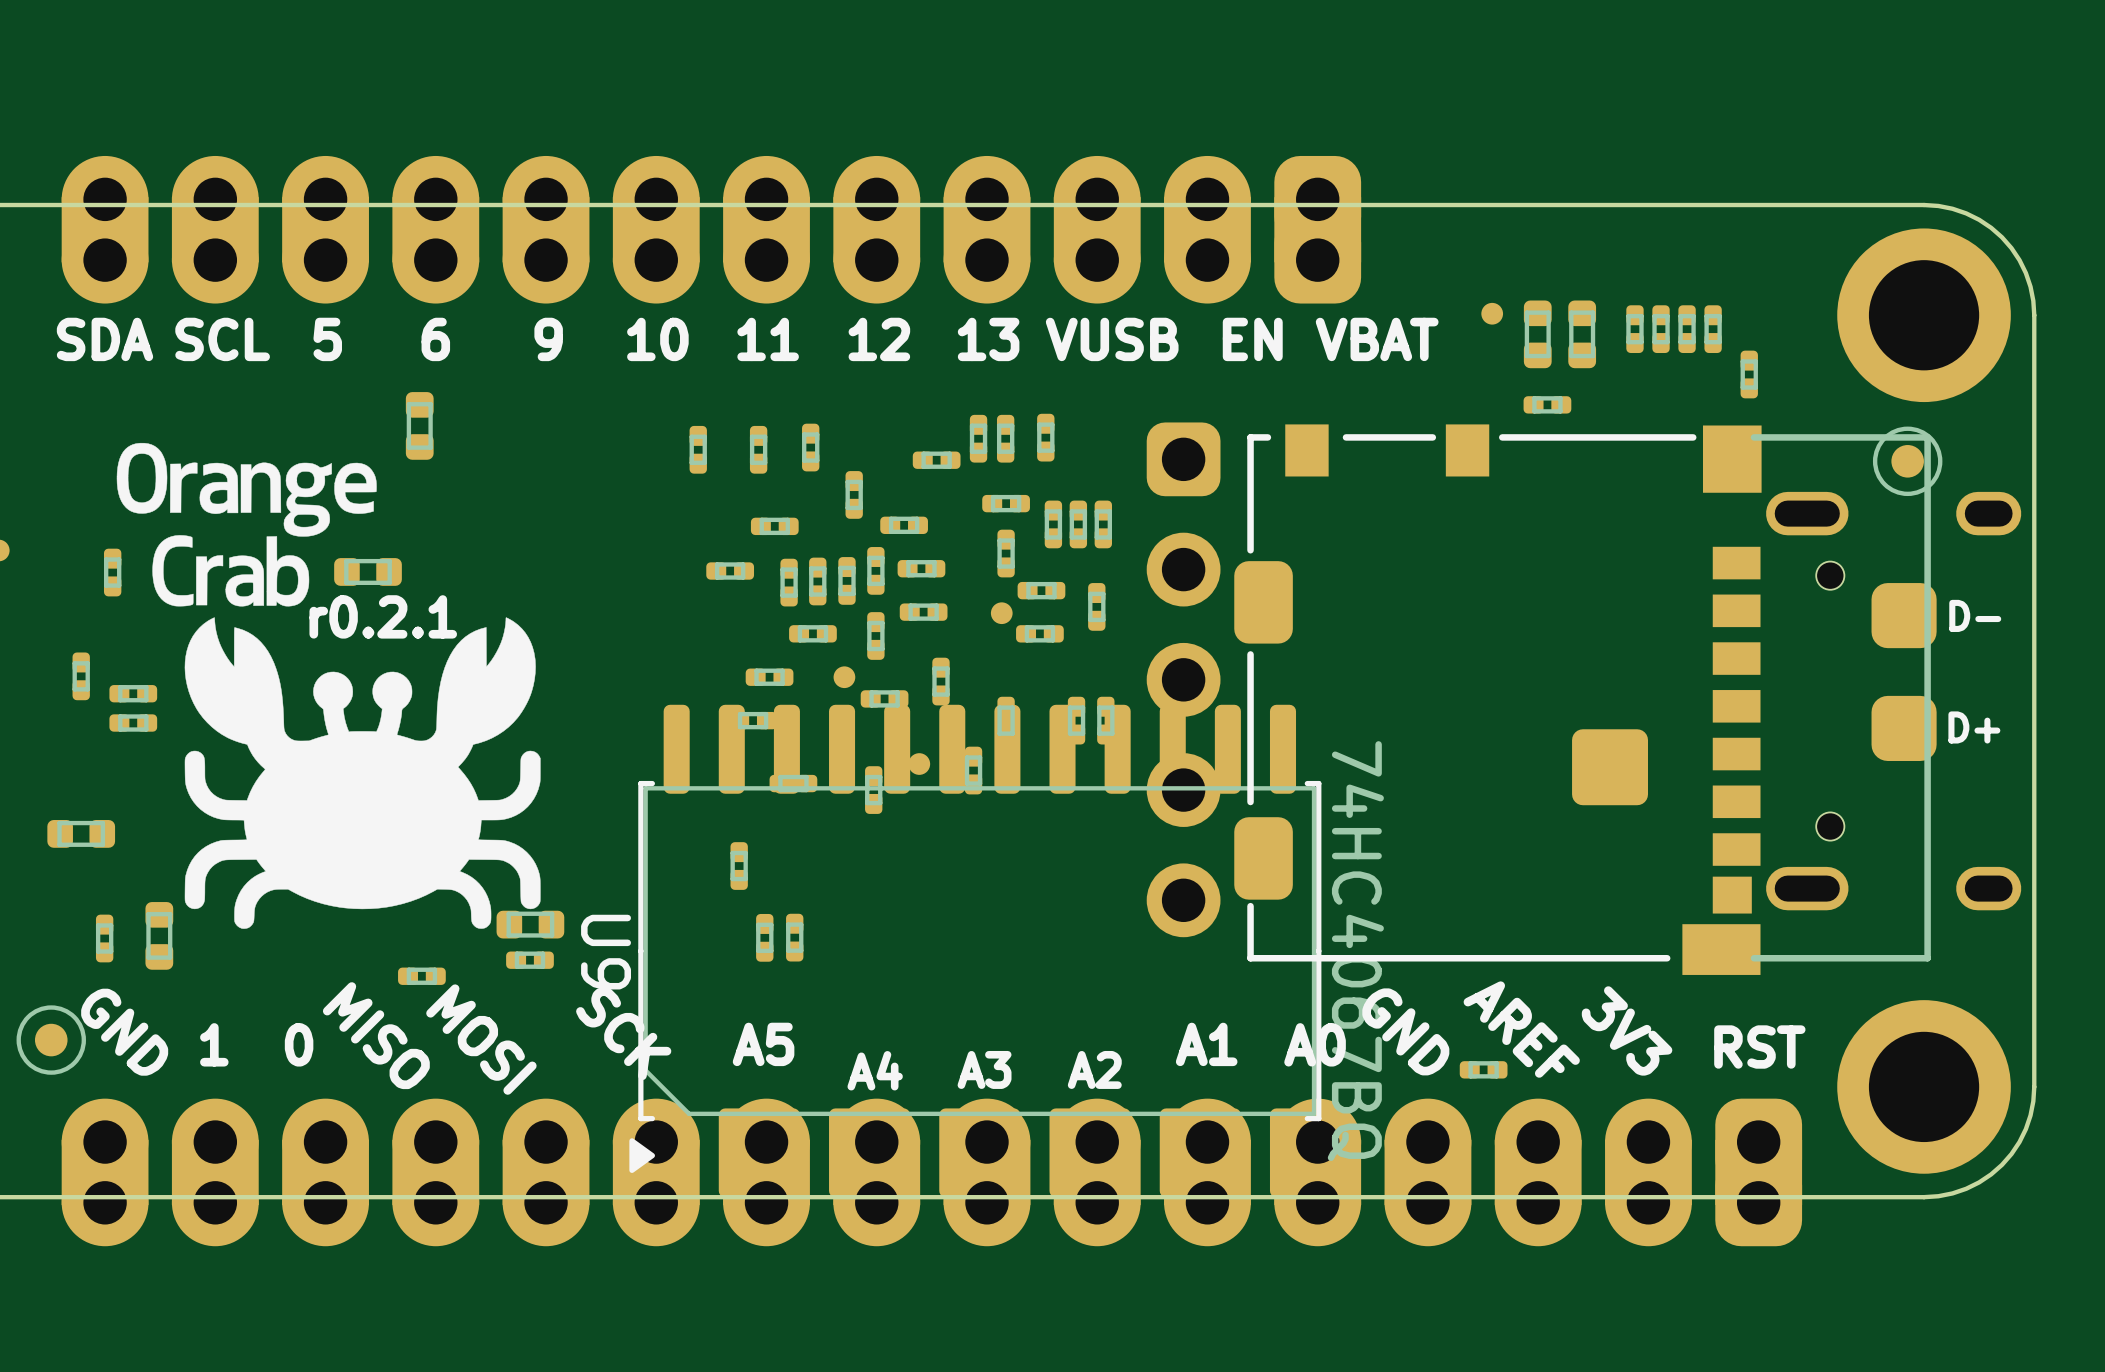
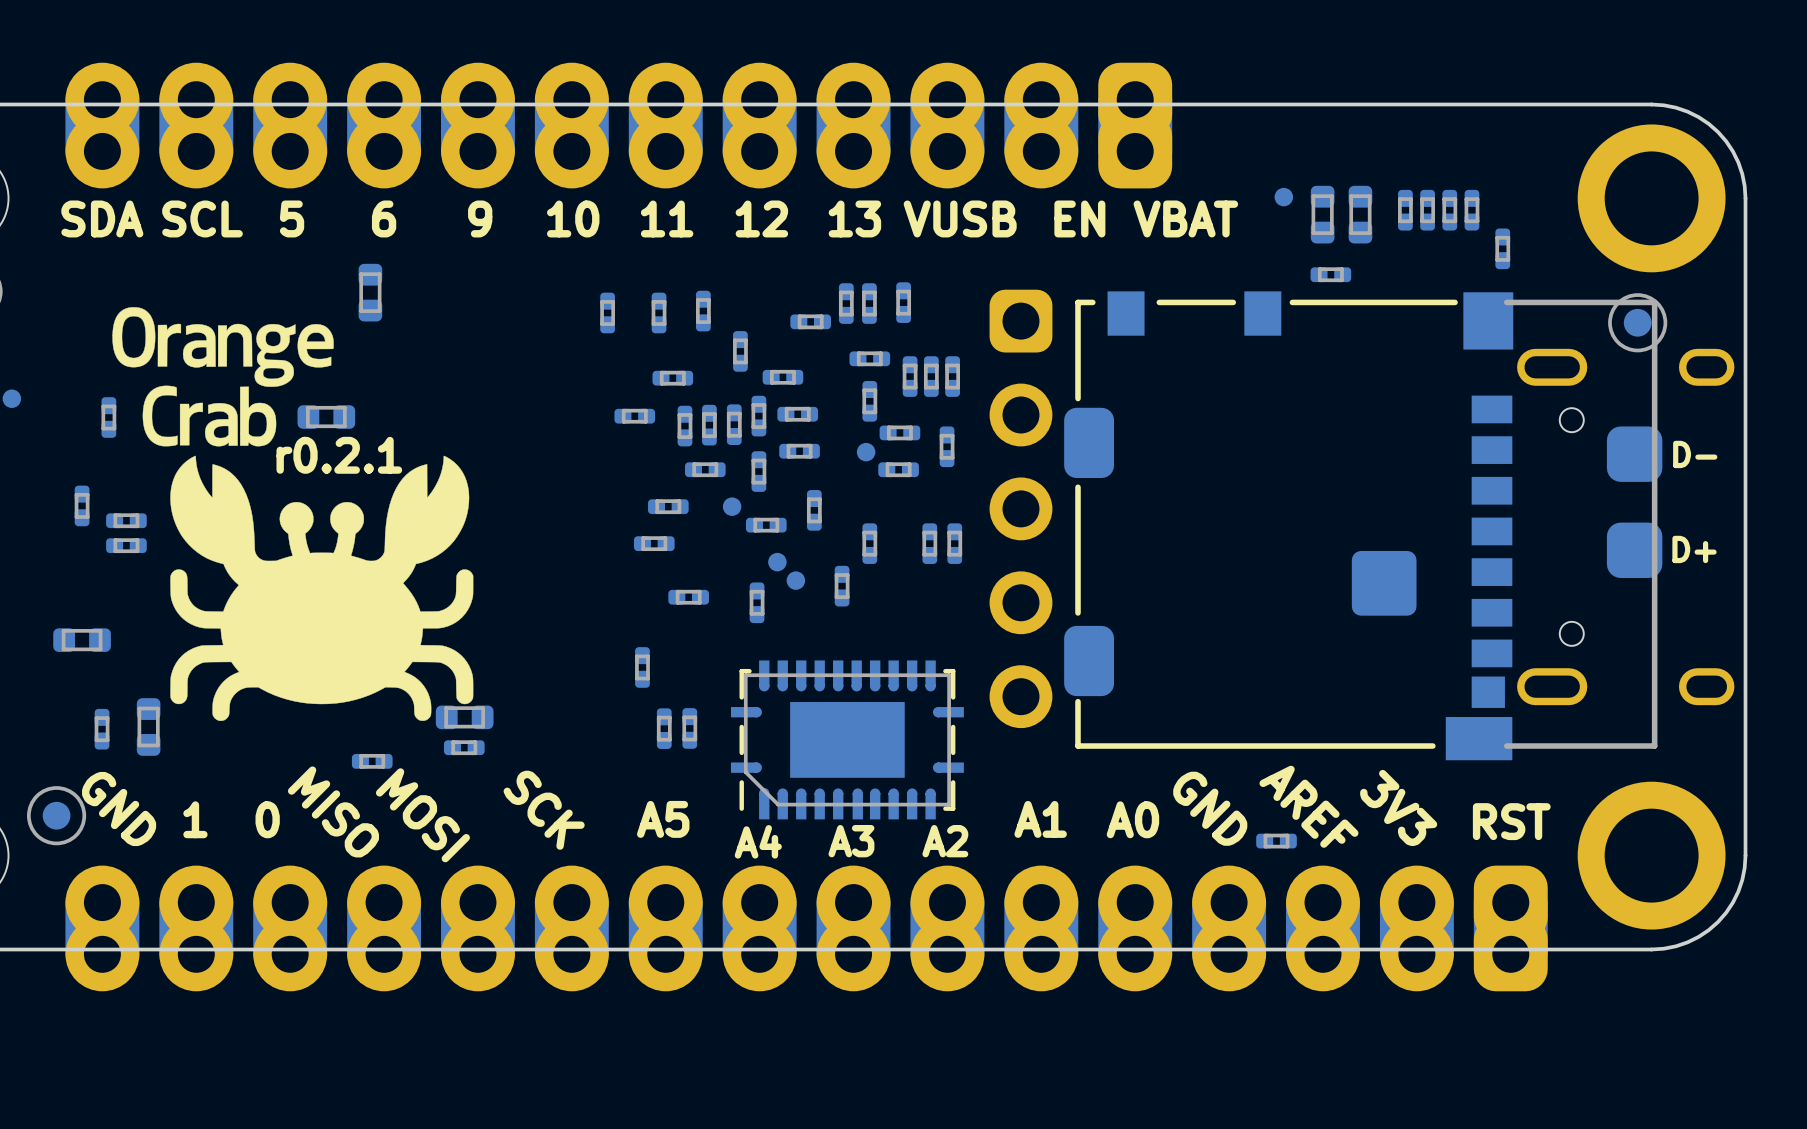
U9: 74HC4067BQ (975, 951) -> none
part: none -> (847, 739)

